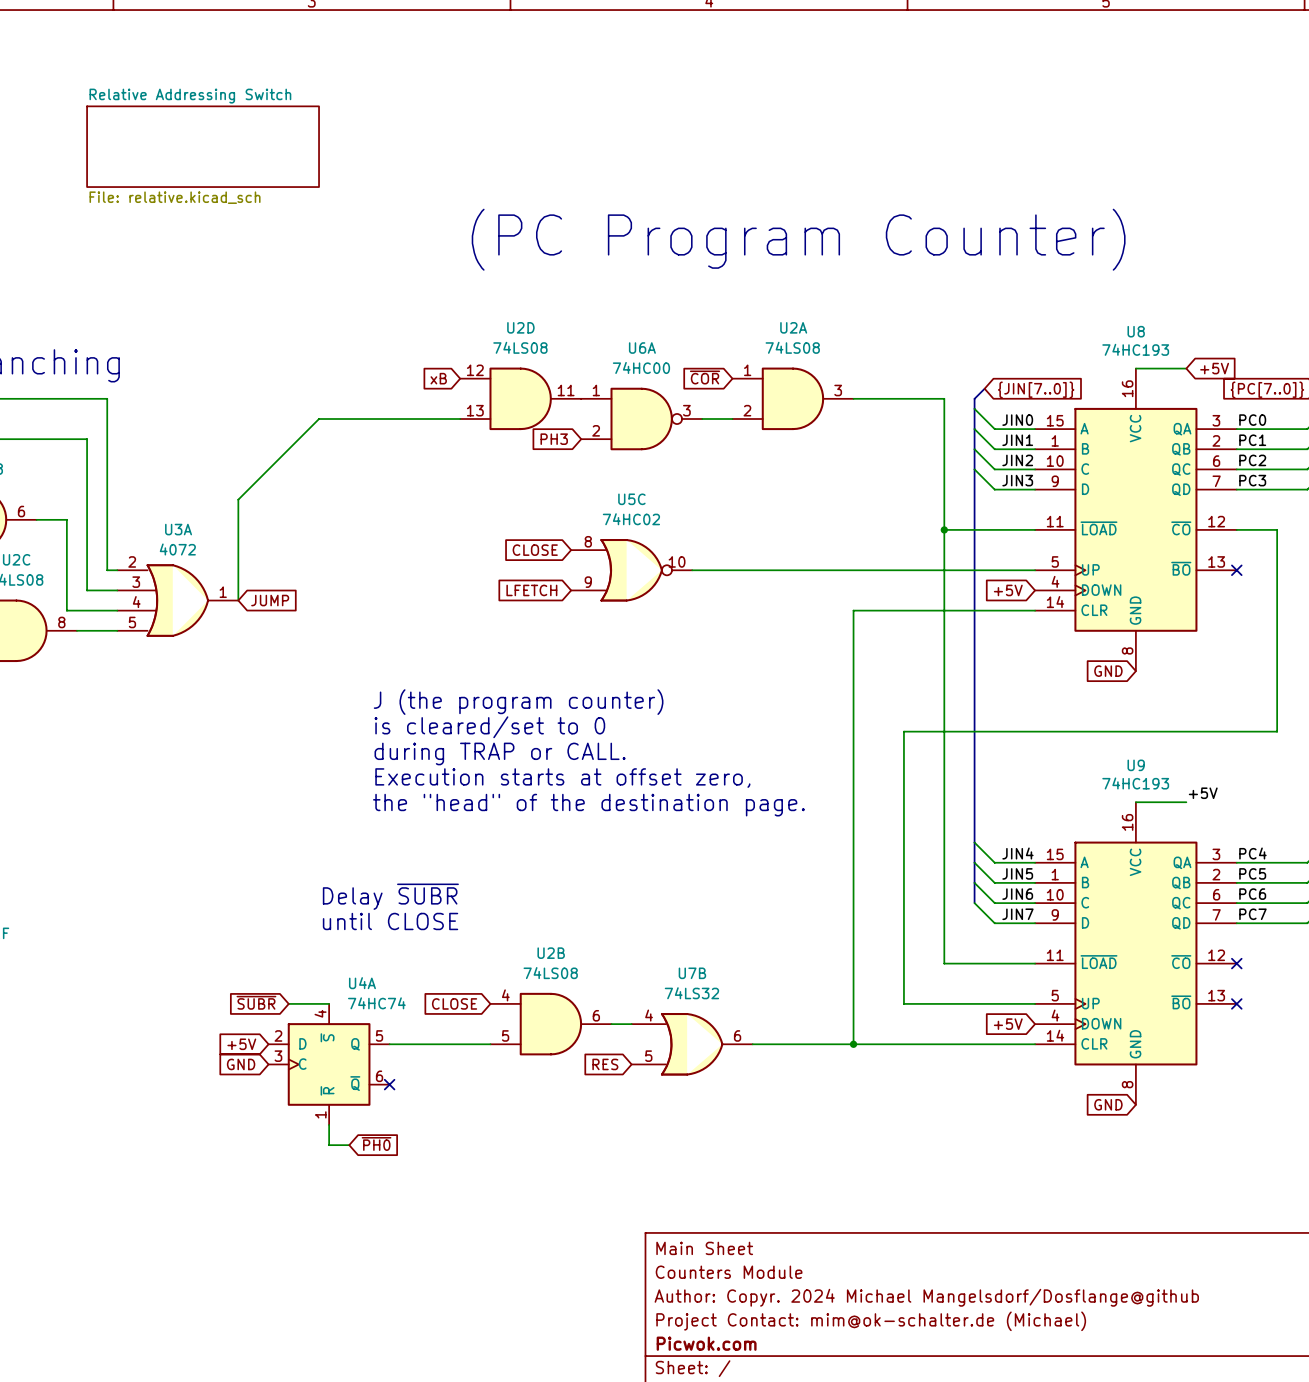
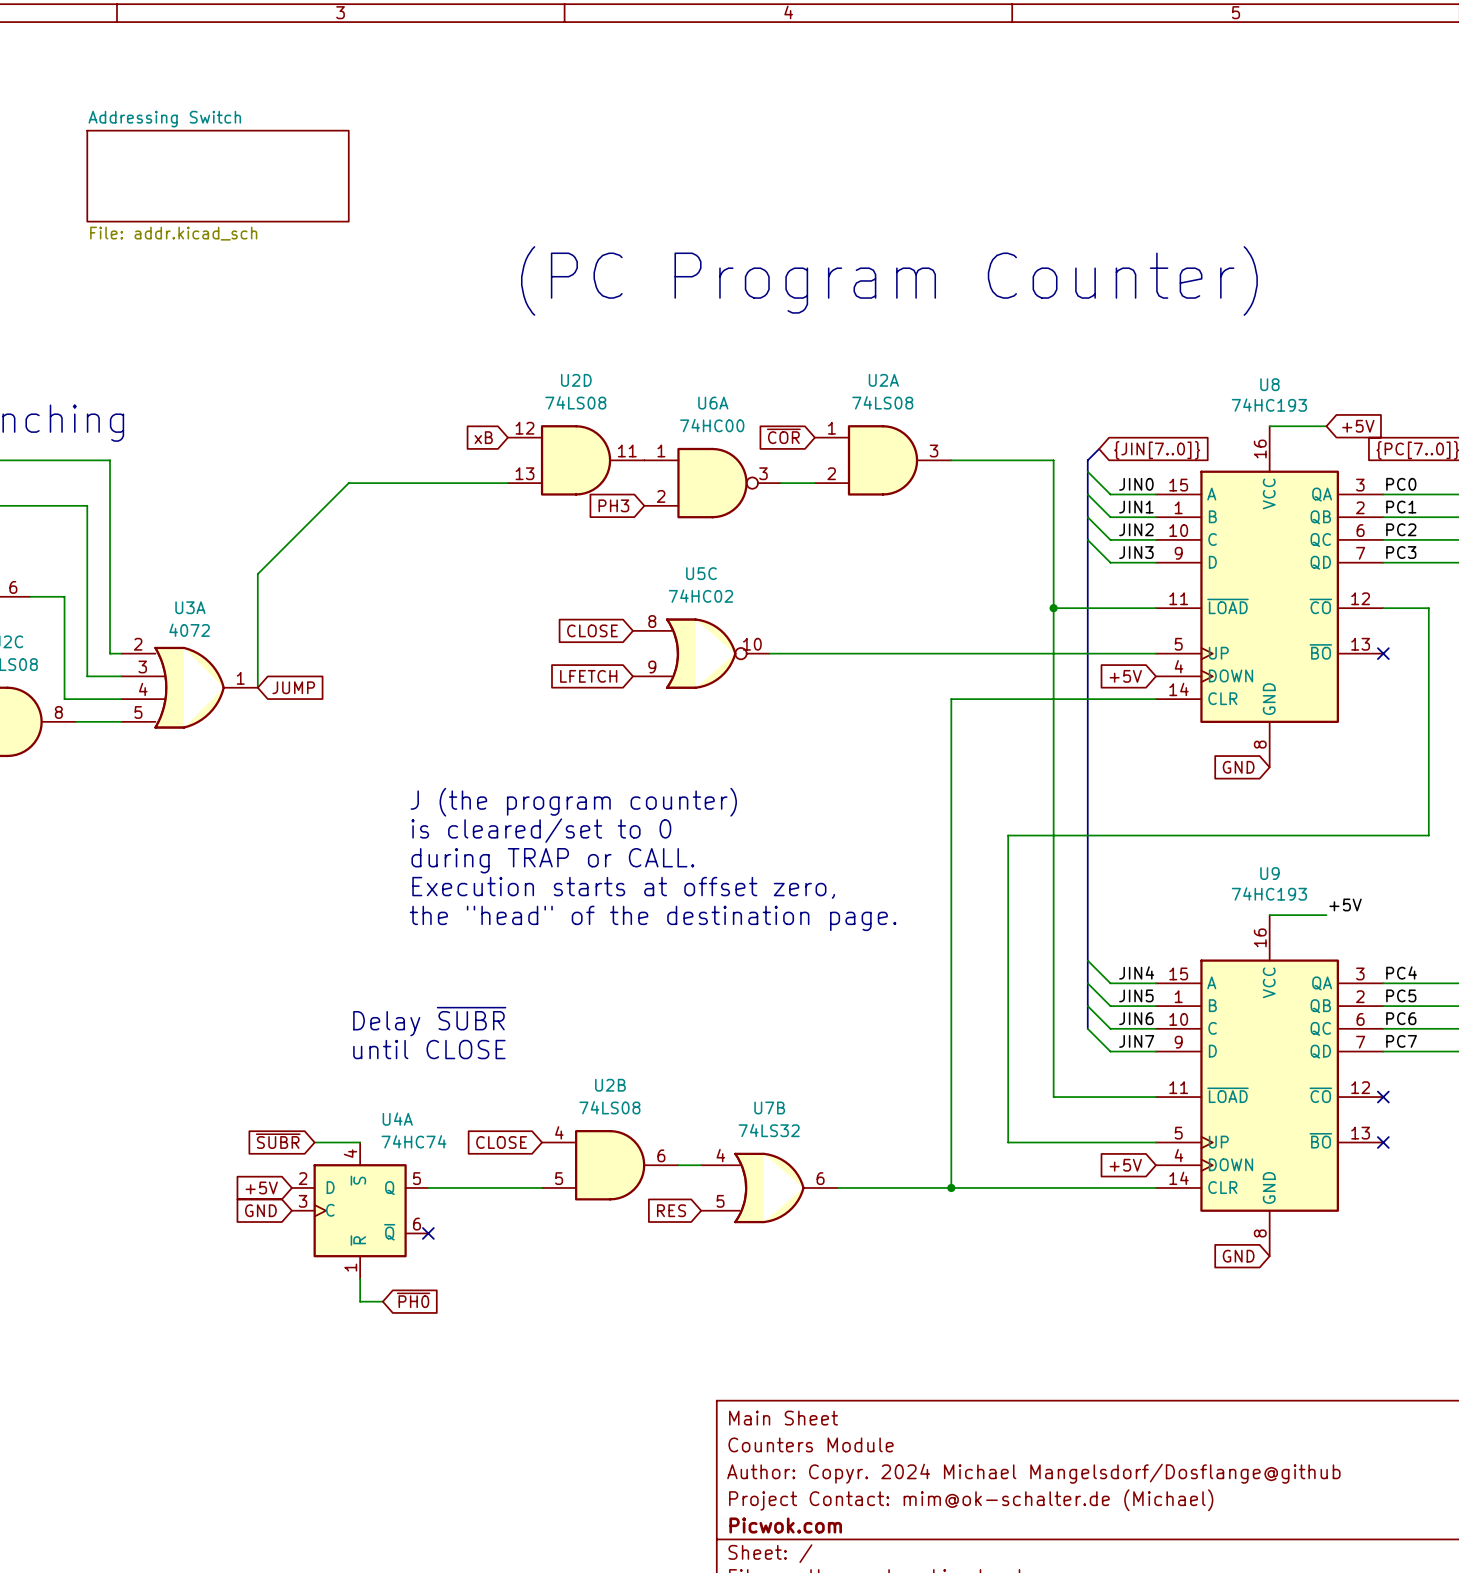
sheet Relative Addressing Switch name: Relative Addressing Switch (190, 96) -> Addressing Switch (164, 119)
sheet Relative Addressing Switch value: File: relative.kicad_sch (175, 197) -> File: addr.kicad_sch (173, 233)

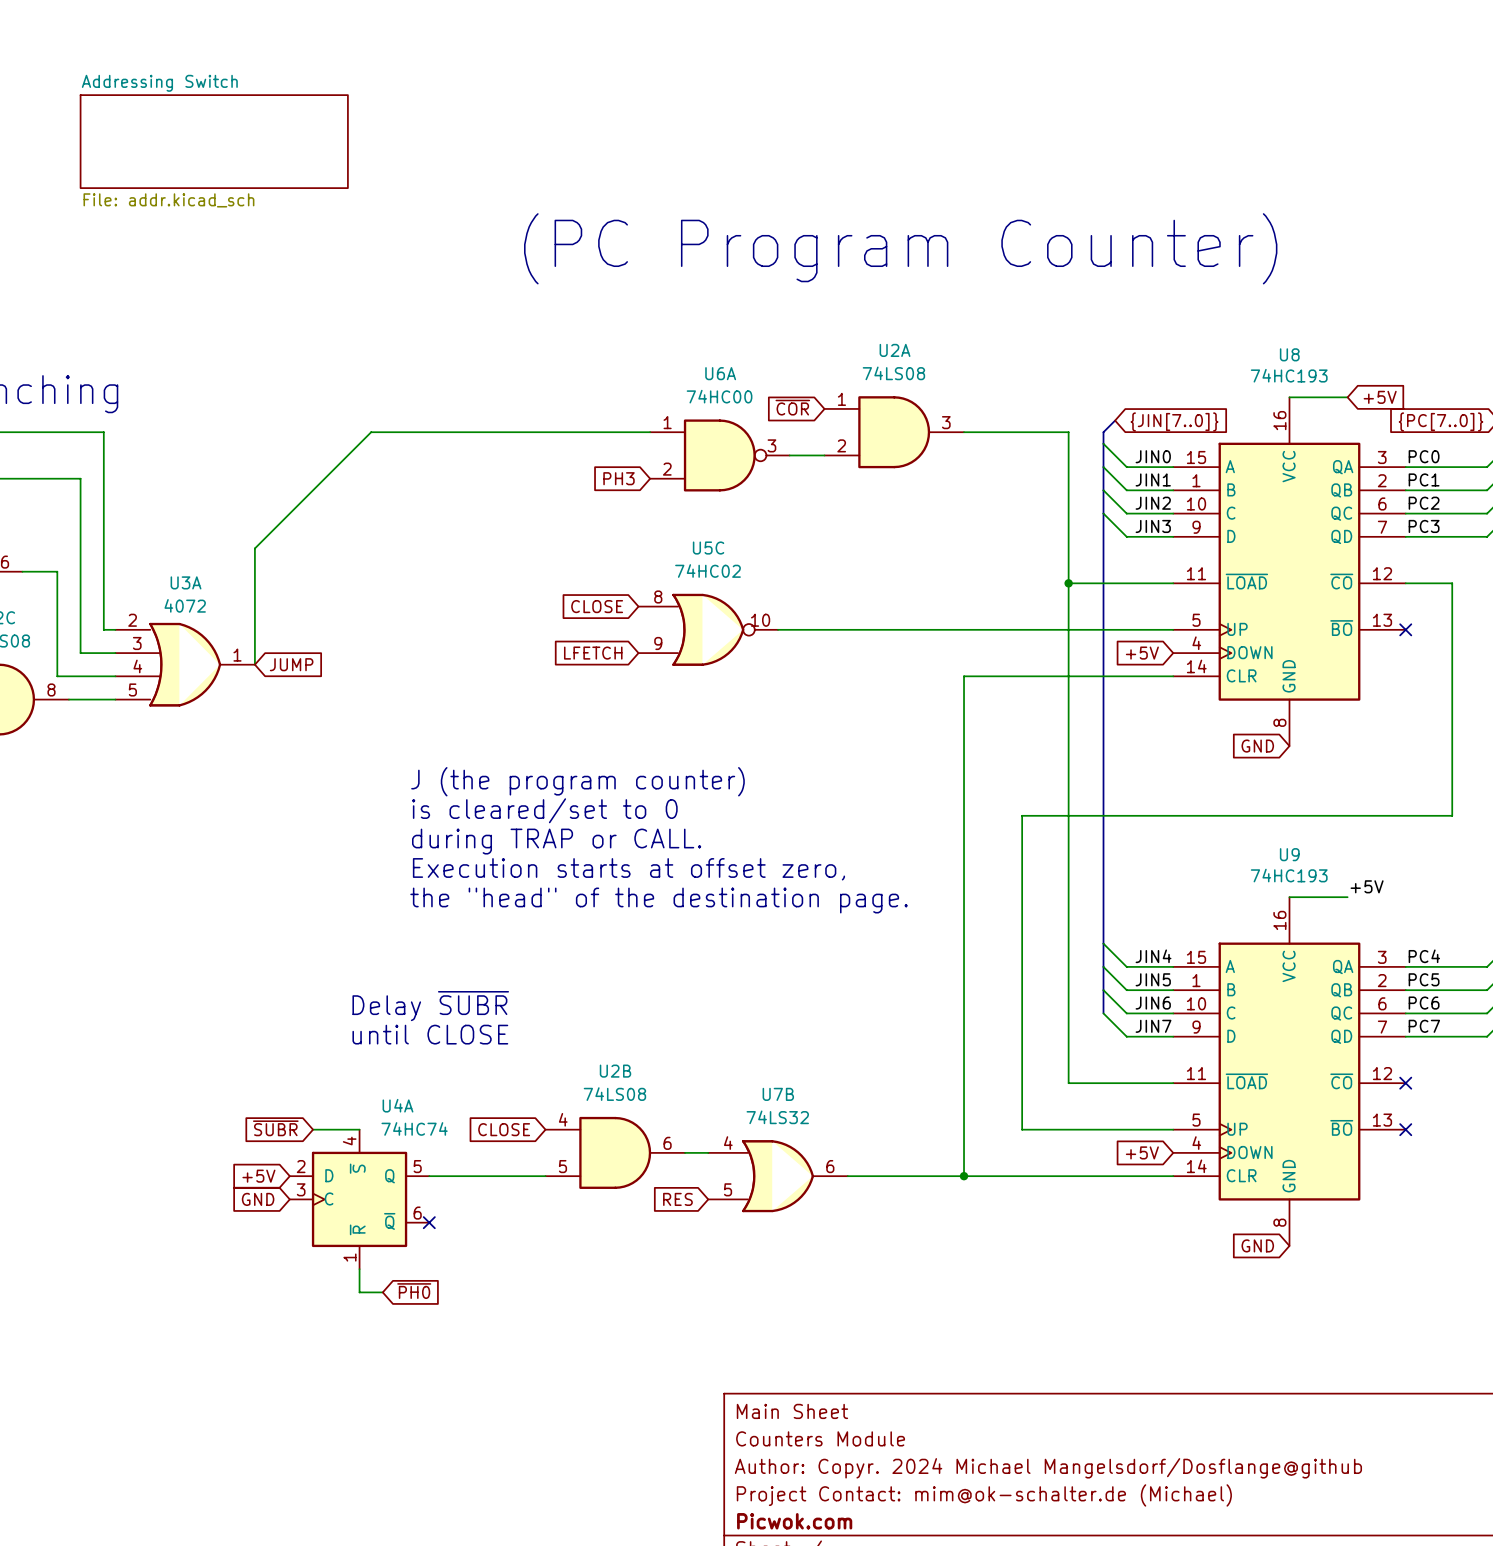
global label: xB (483, 437) -> none
U2D: 74LS08 (576, 460) -> none
wire: (348, 483) (507, 483) -> (347, 455) (371, 432) (650, 432)

